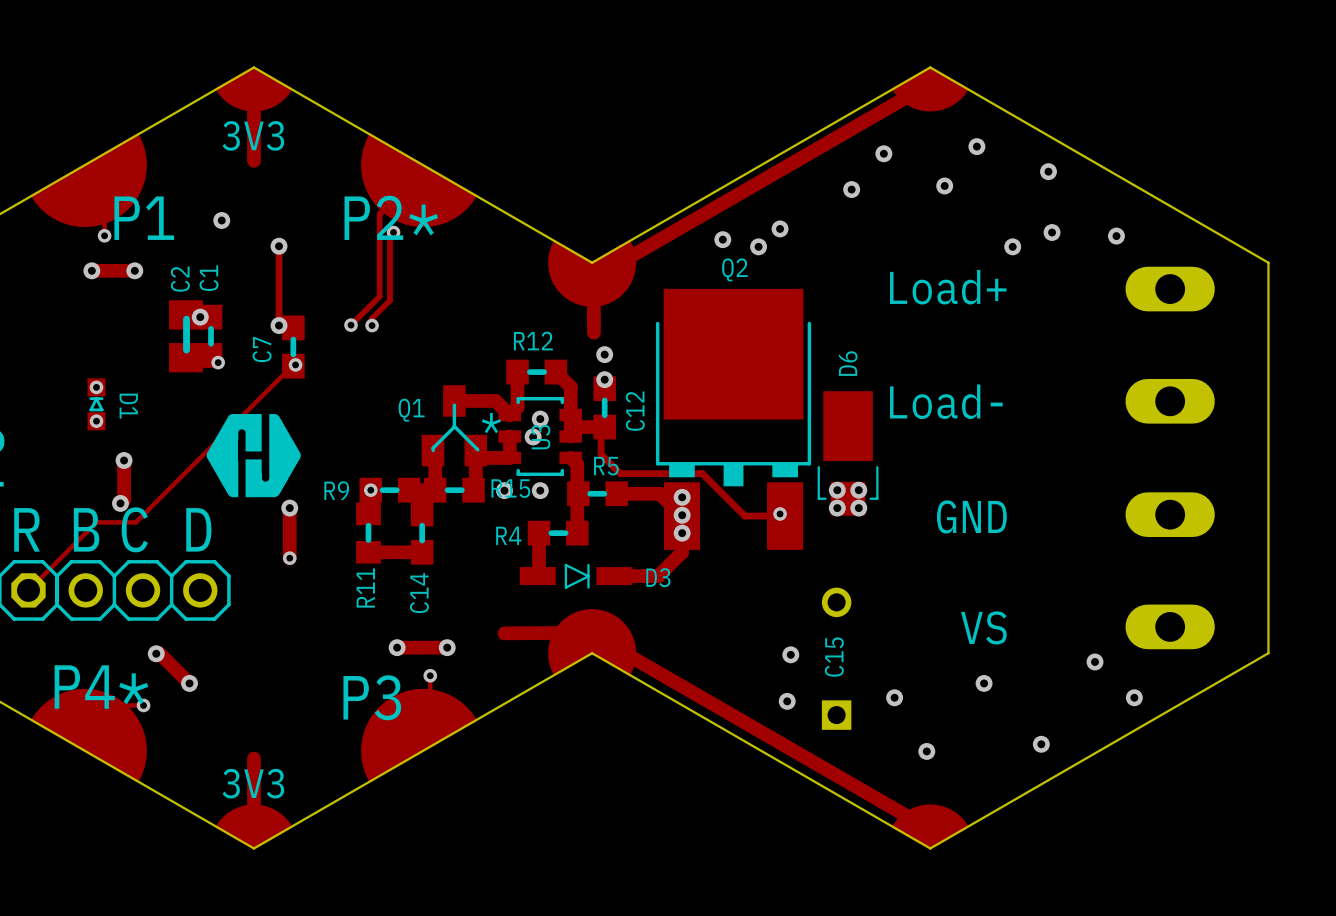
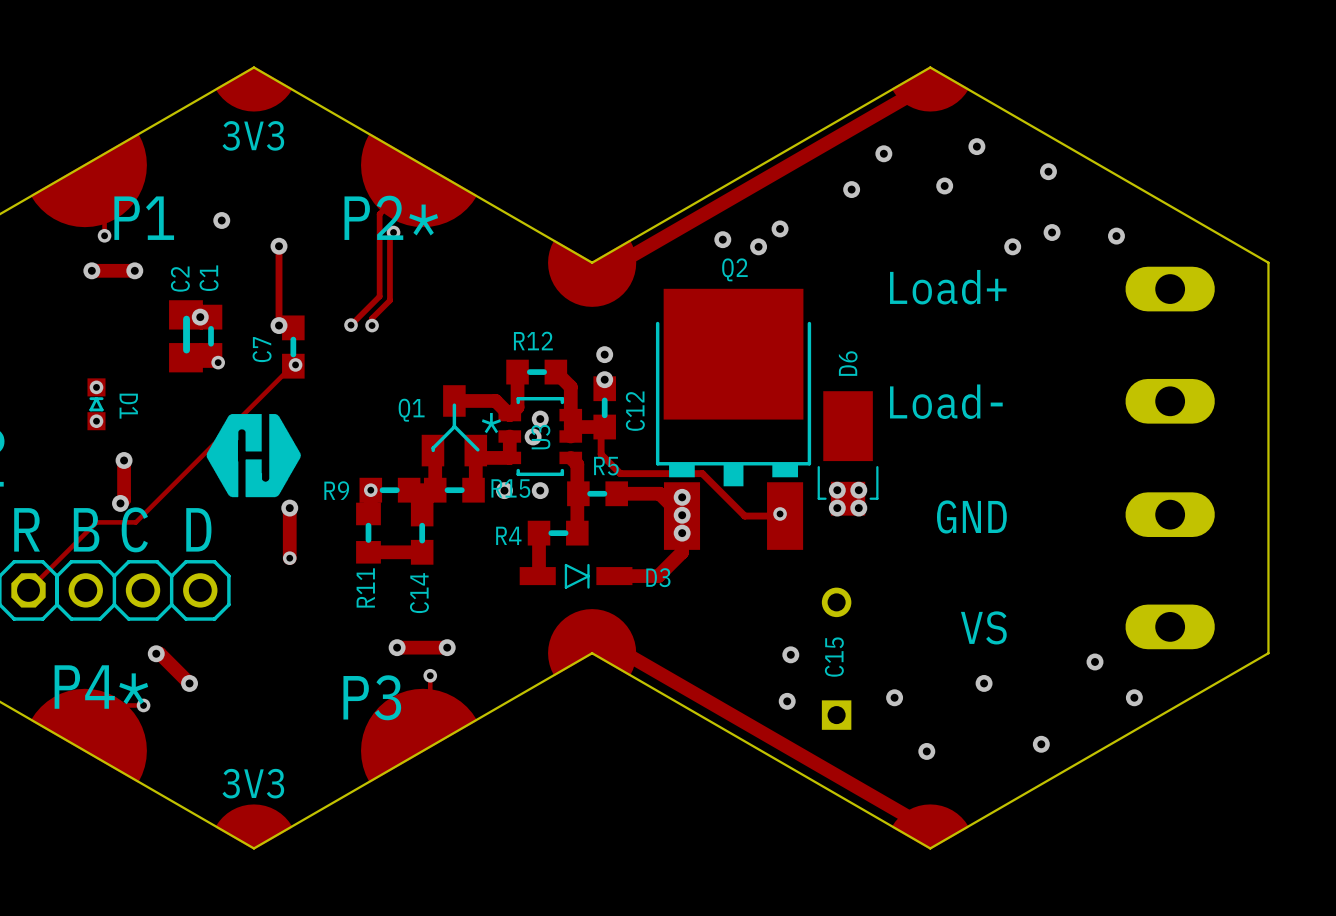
track: (253, 85) (253, 160) -> none
track: (593, 283) (593, 332) -> none
track: (593, 632) (504, 633) -> none
track: (253, 758) (253, 830) -> none

